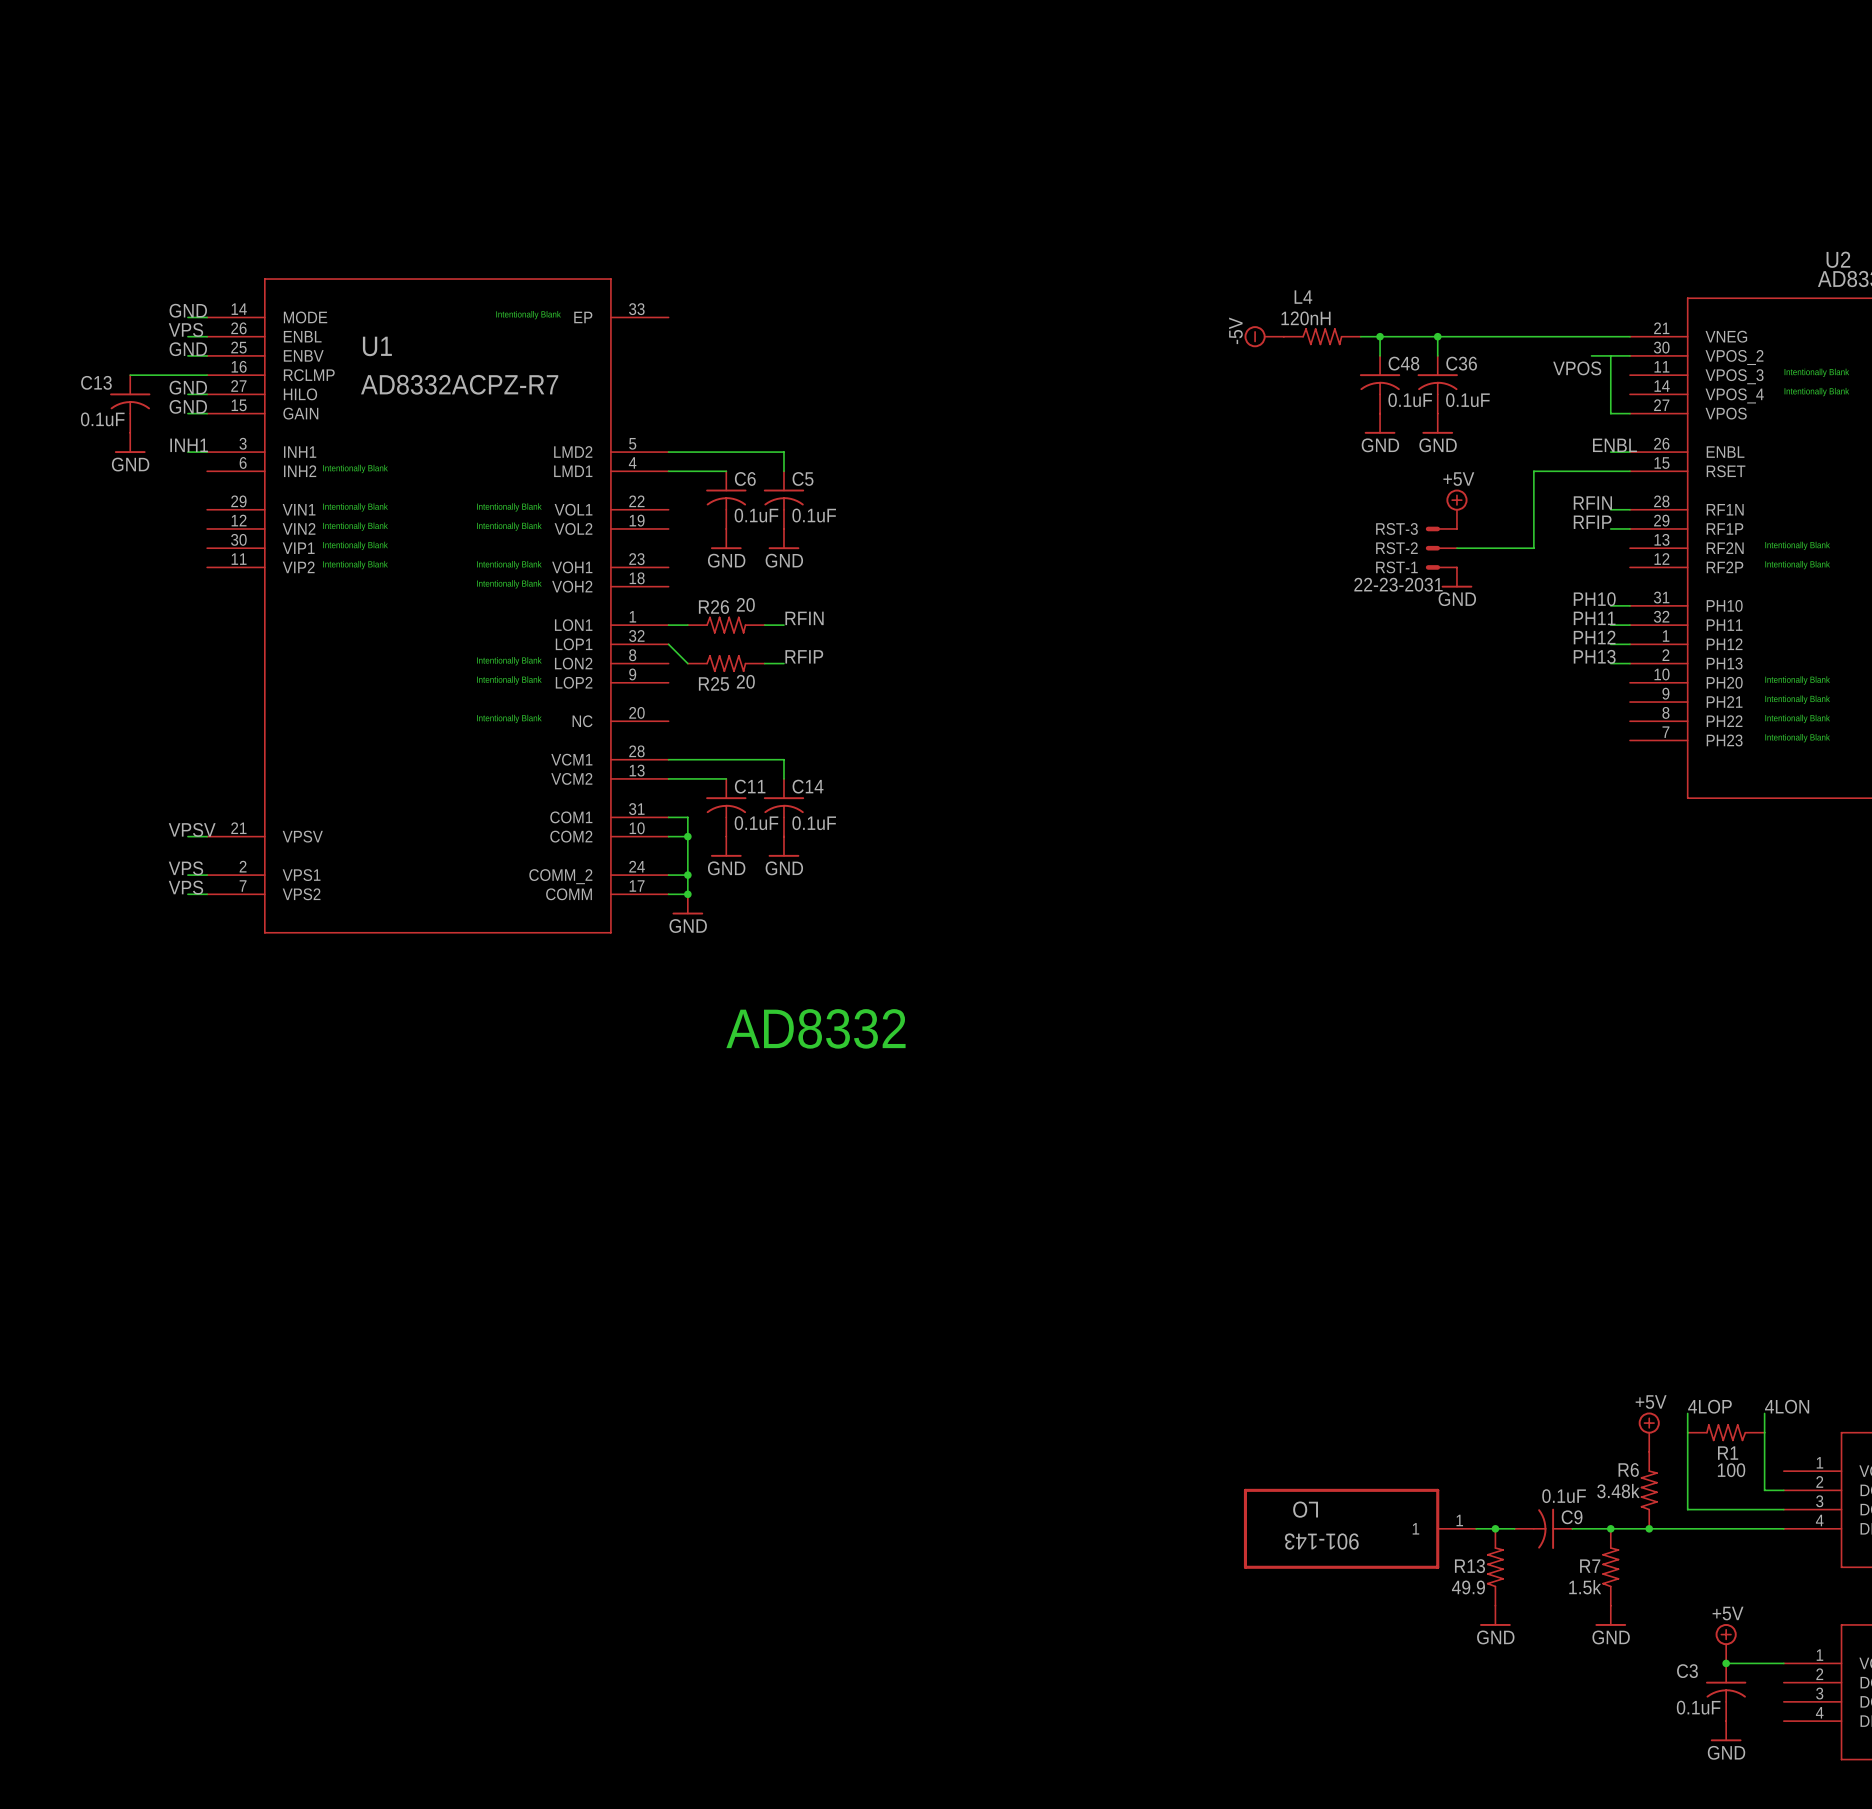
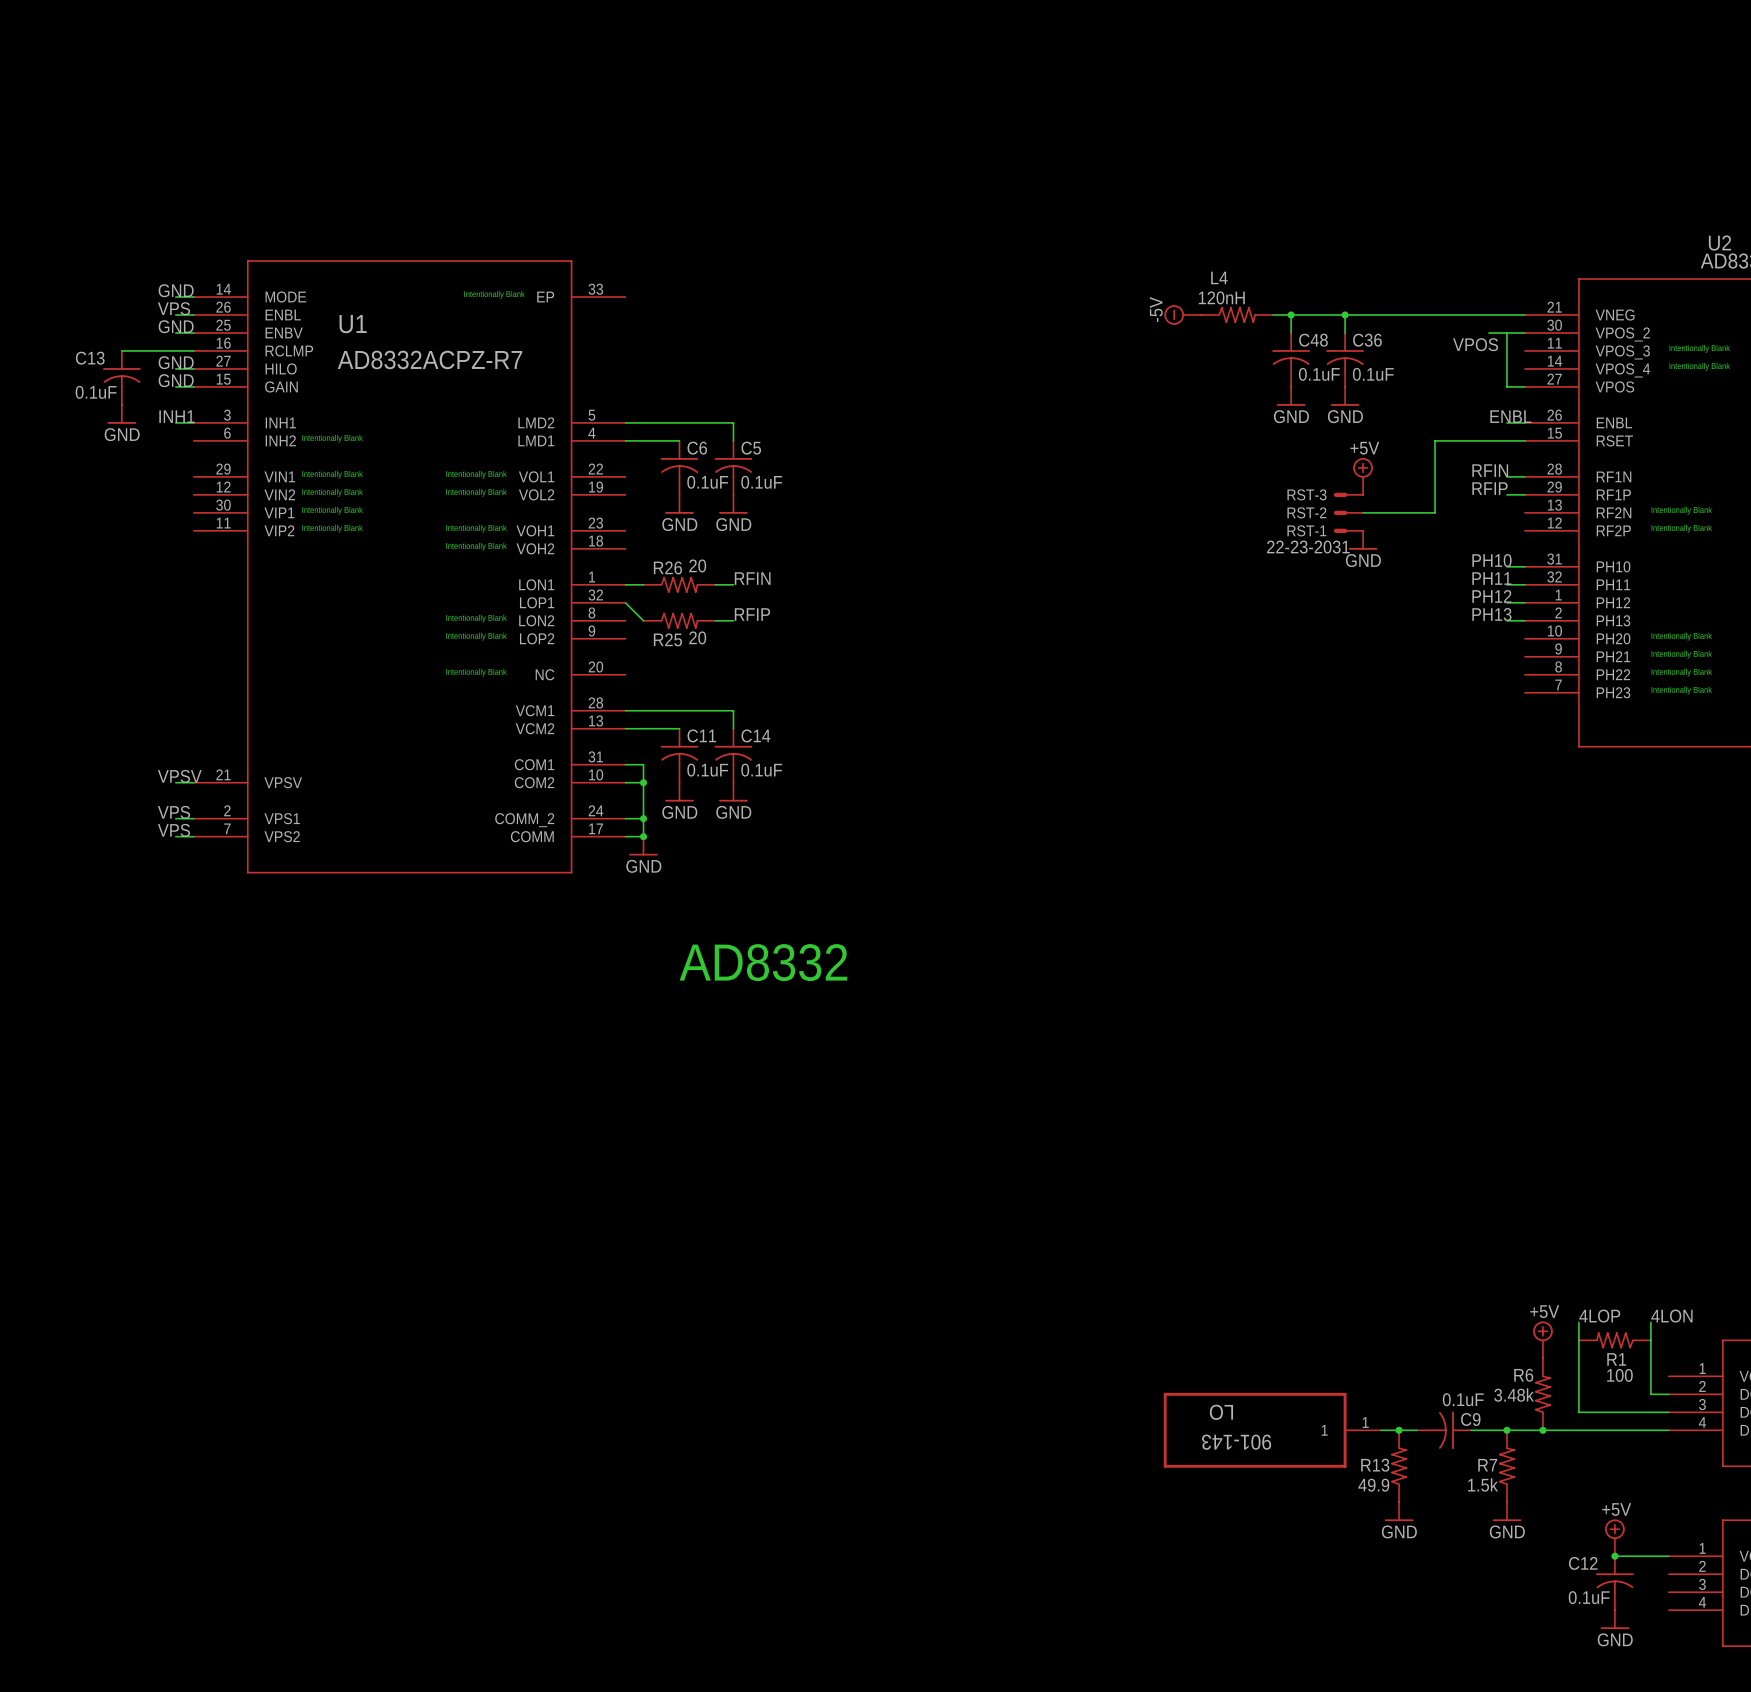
C3 name: C3 (1687, 1671) -> C12 (1583, 1563)

